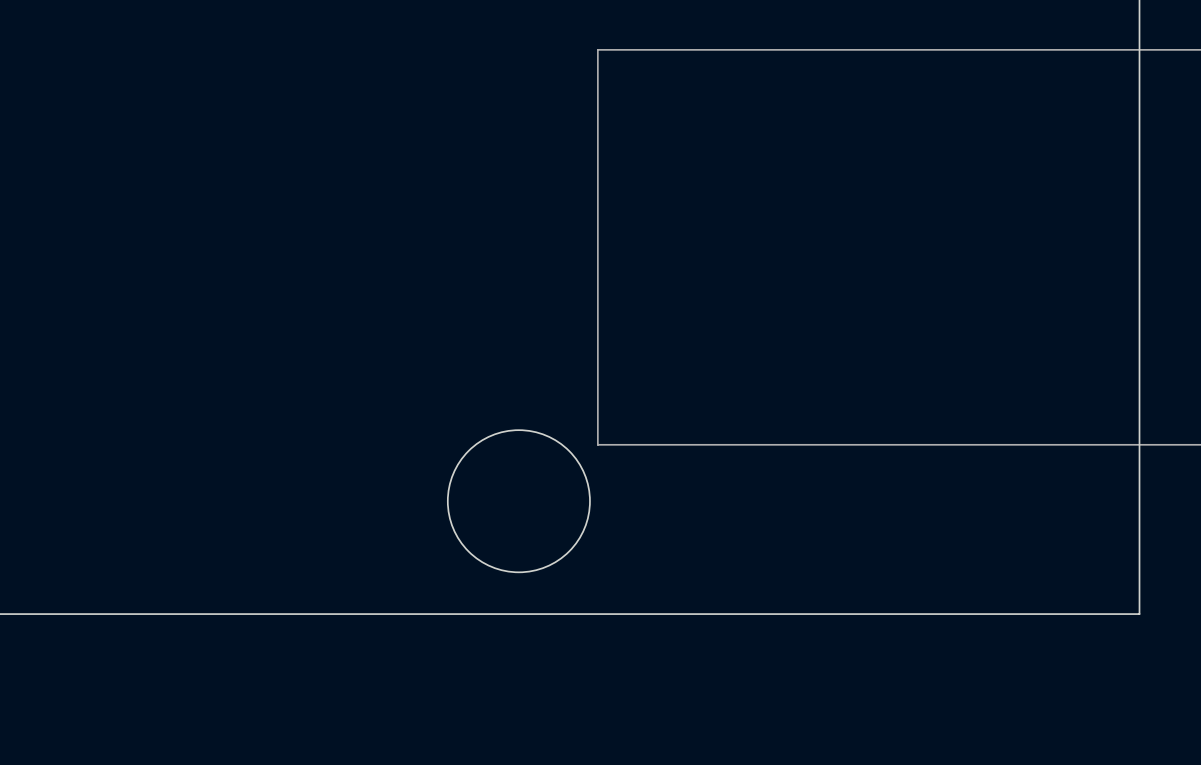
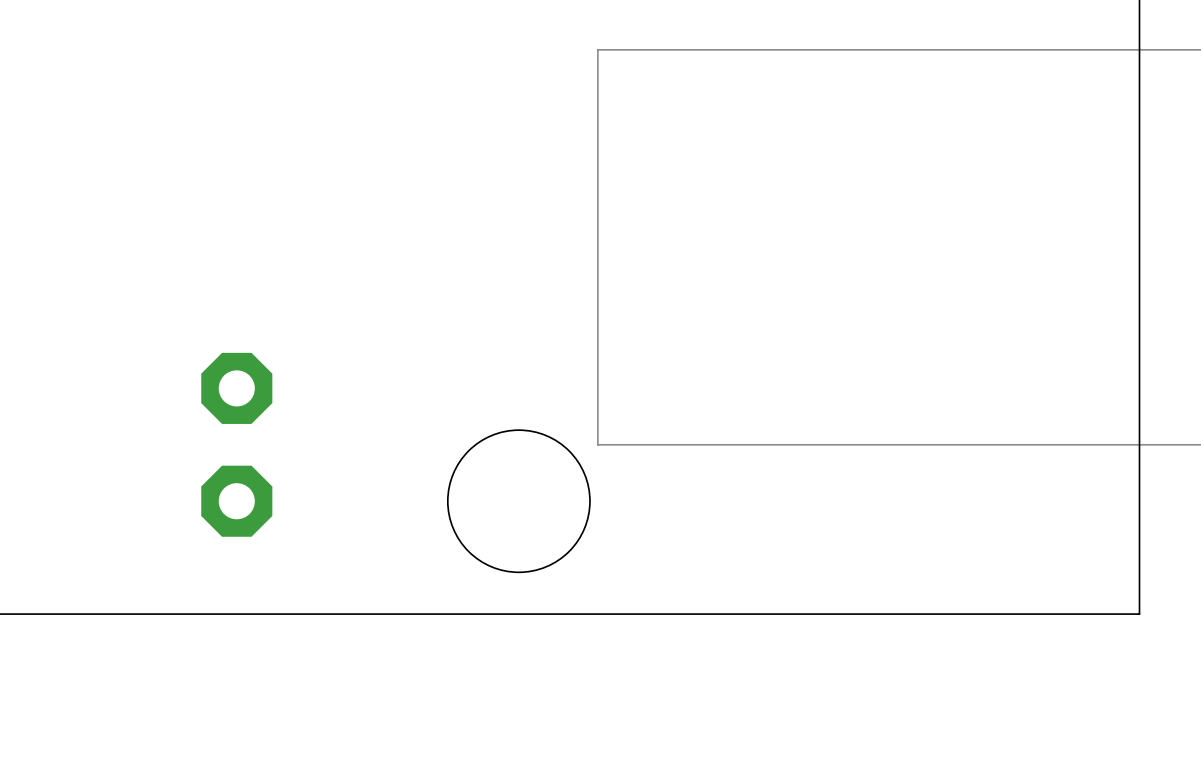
part: none -> (236, 444)

